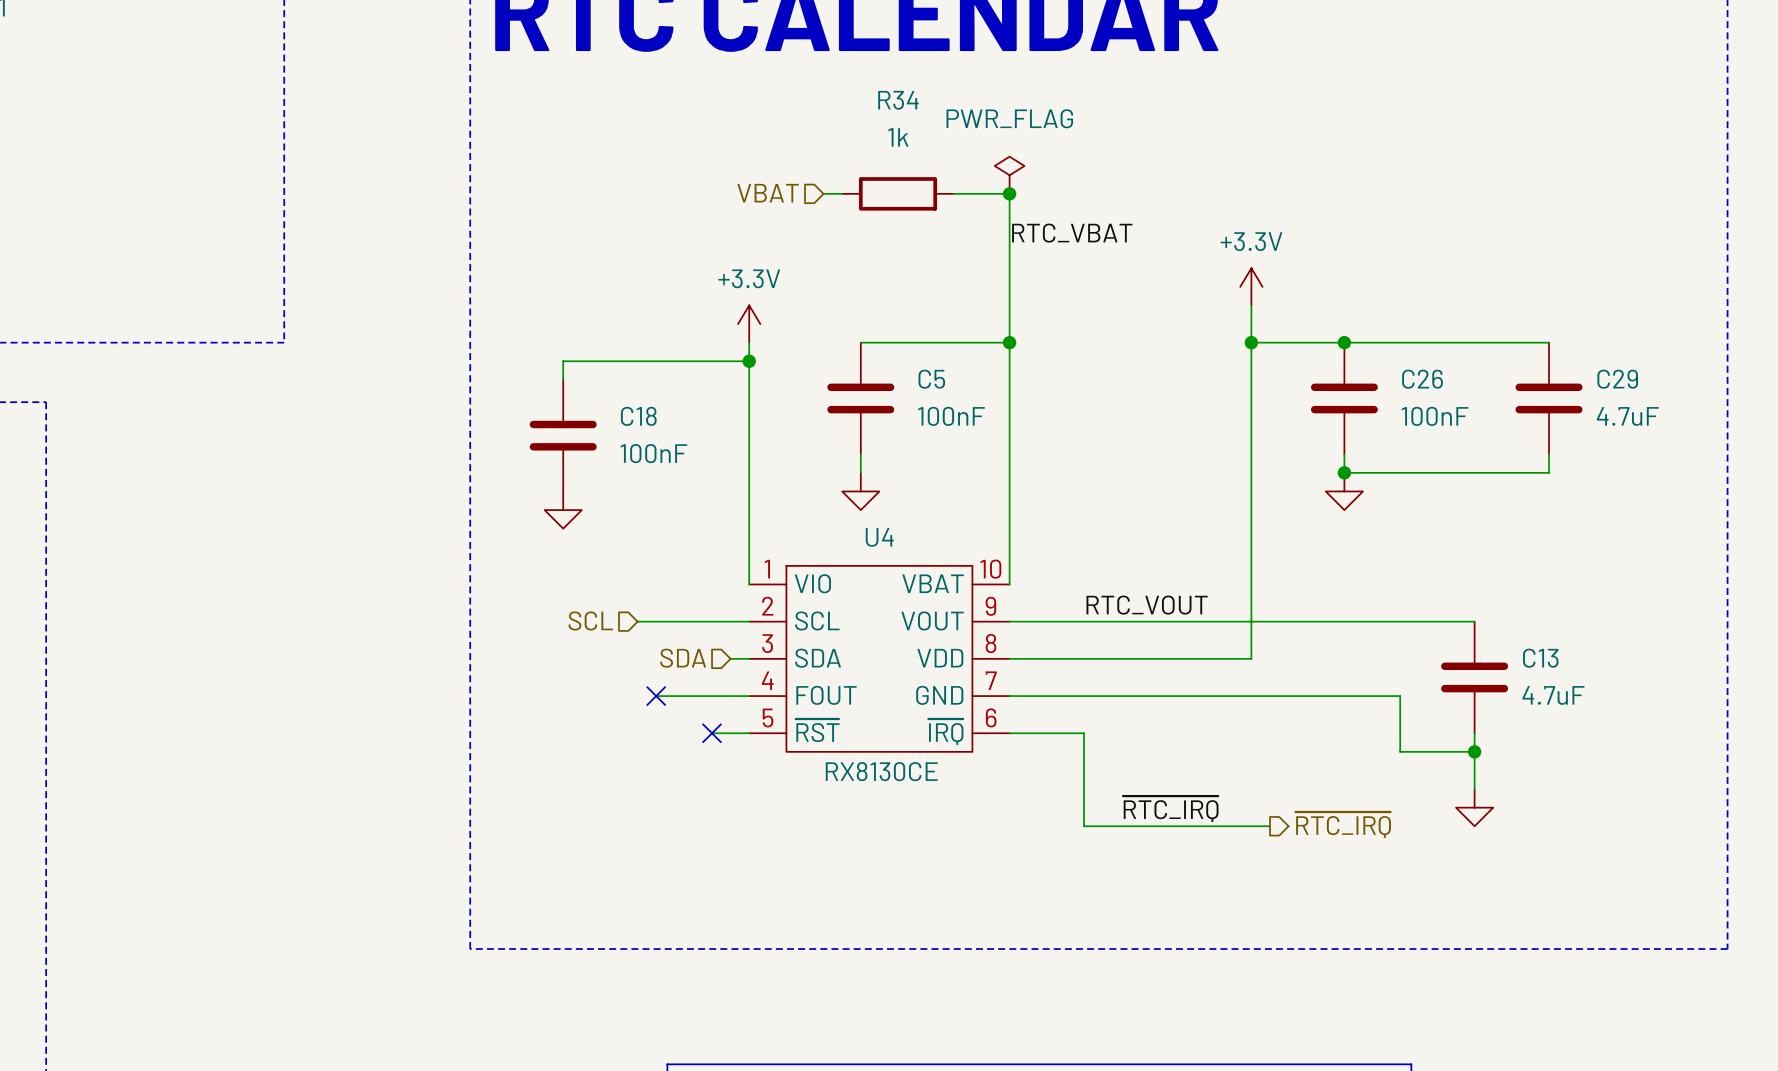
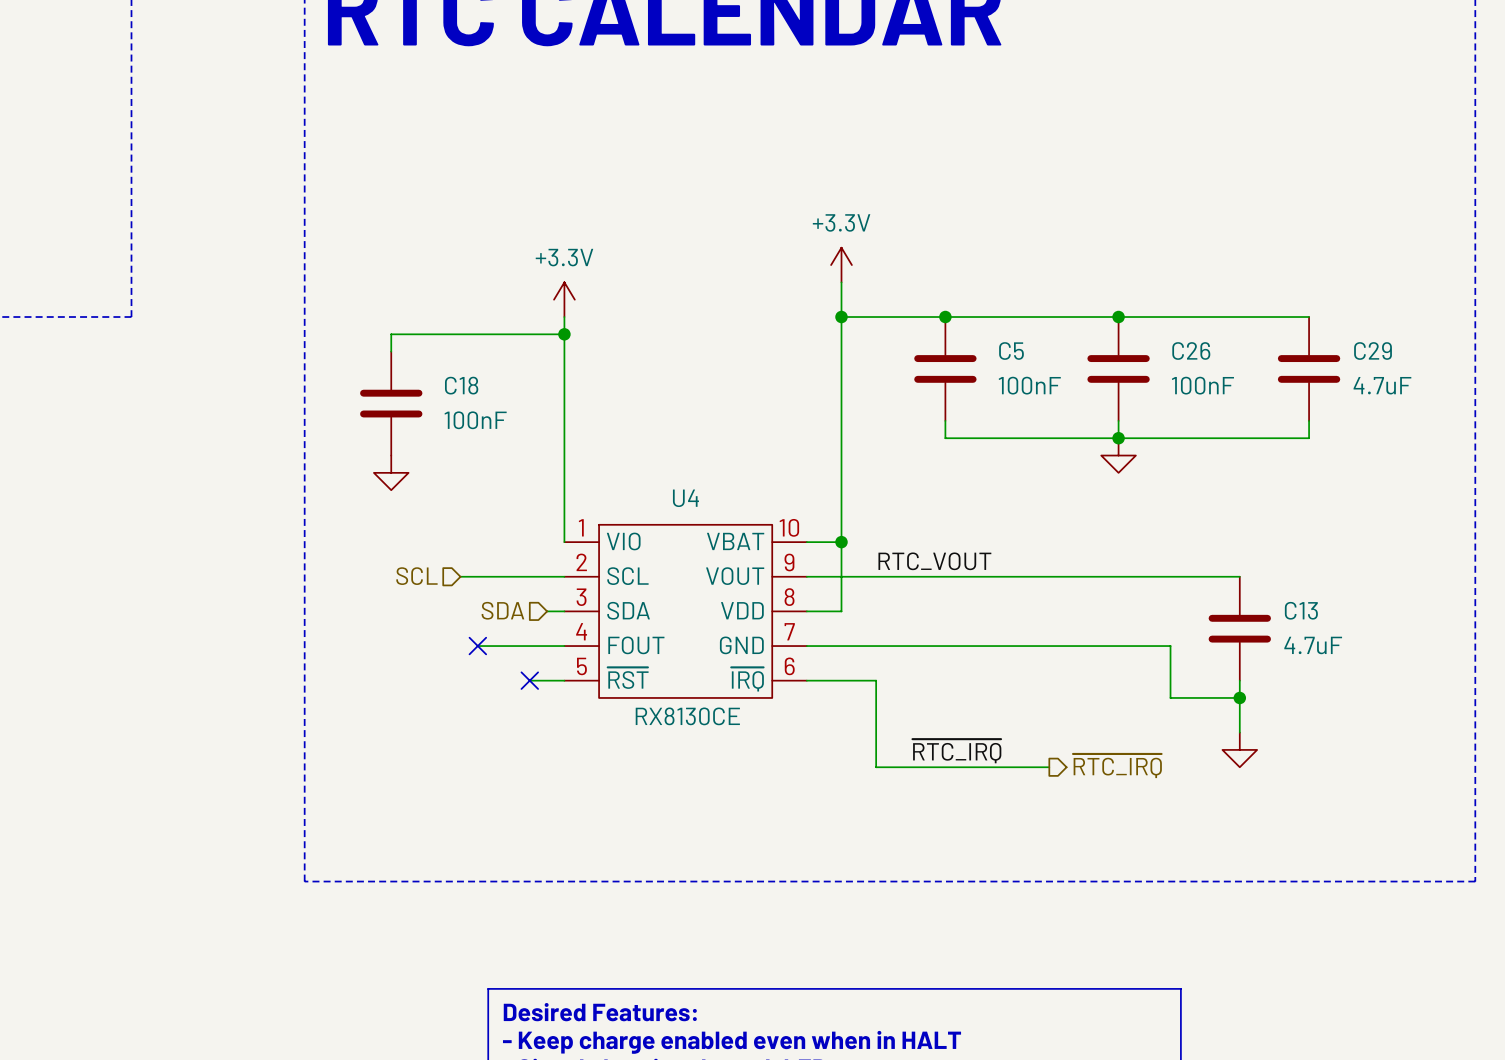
power symbol: PWR_FLAG (1009, 175) -> none
hierarchical label: VBAT (768, 193) -> none
wire: (823, 193) (842, 193) -> none
R34: 1k (898, 193) -> none
wire: (953, 193) (1009, 193) (1009, 584) -> (841, 542) (806, 542)
junction: (1009, 193) -> none
label: RTC_VBAT (1072, 233) -> none
power symbol position: +3.3V (1251, 286) -> +3.3V (841, 265)
wire: (1251, 305) (1251, 658) (1046, 658) -> (841, 282) (841, 611)
wire: (860, 342) (1009, 342) -> none
junction position: (1009, 342) -> (841, 317)
wire: none -> (841, 317) (1031, 317)
junction: none -> (945, 317)
junction: (1251, 342) -> none
C5 position: (860, 398) -> (945, 368)
wire: (860, 454) (860, 472) -> none
wire: none -> (945, 420) (945, 438) (1118, 438)
power symbol: (860, 491) -> none
junction: none -> (841, 542)

